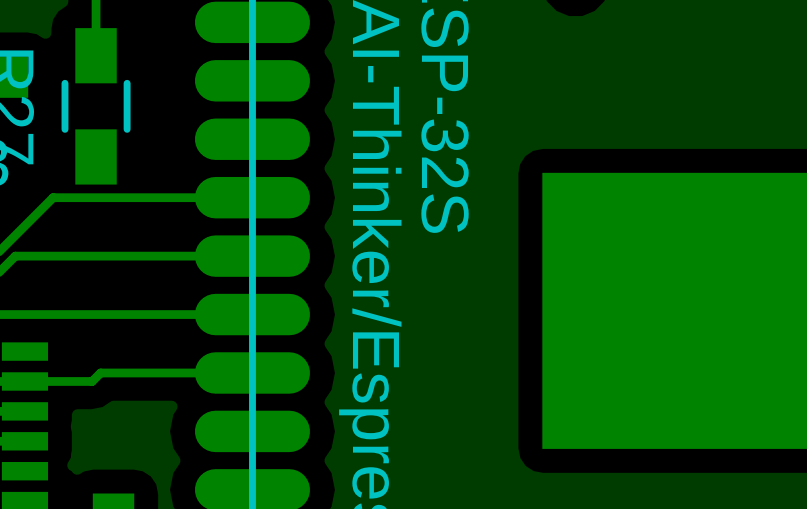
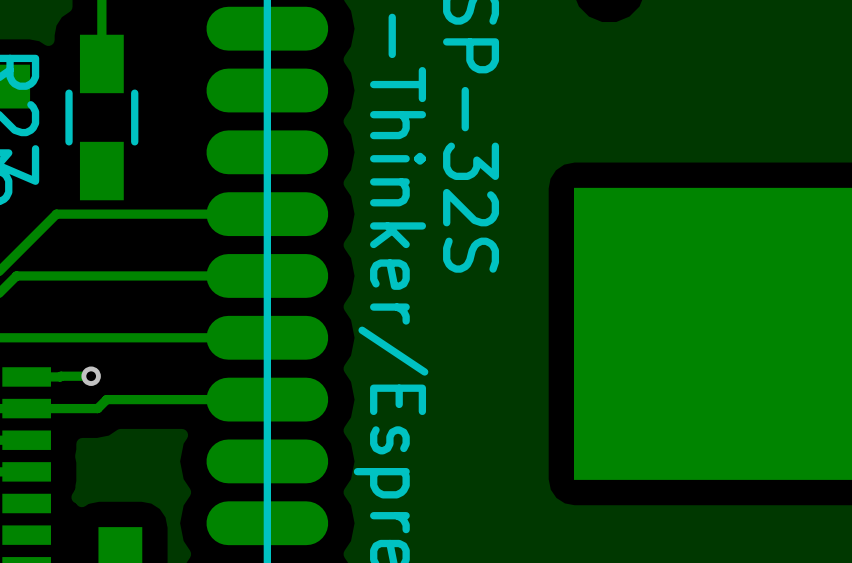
track: none -> (91, 376) (26, 376)
via: none -> (91, 376)

